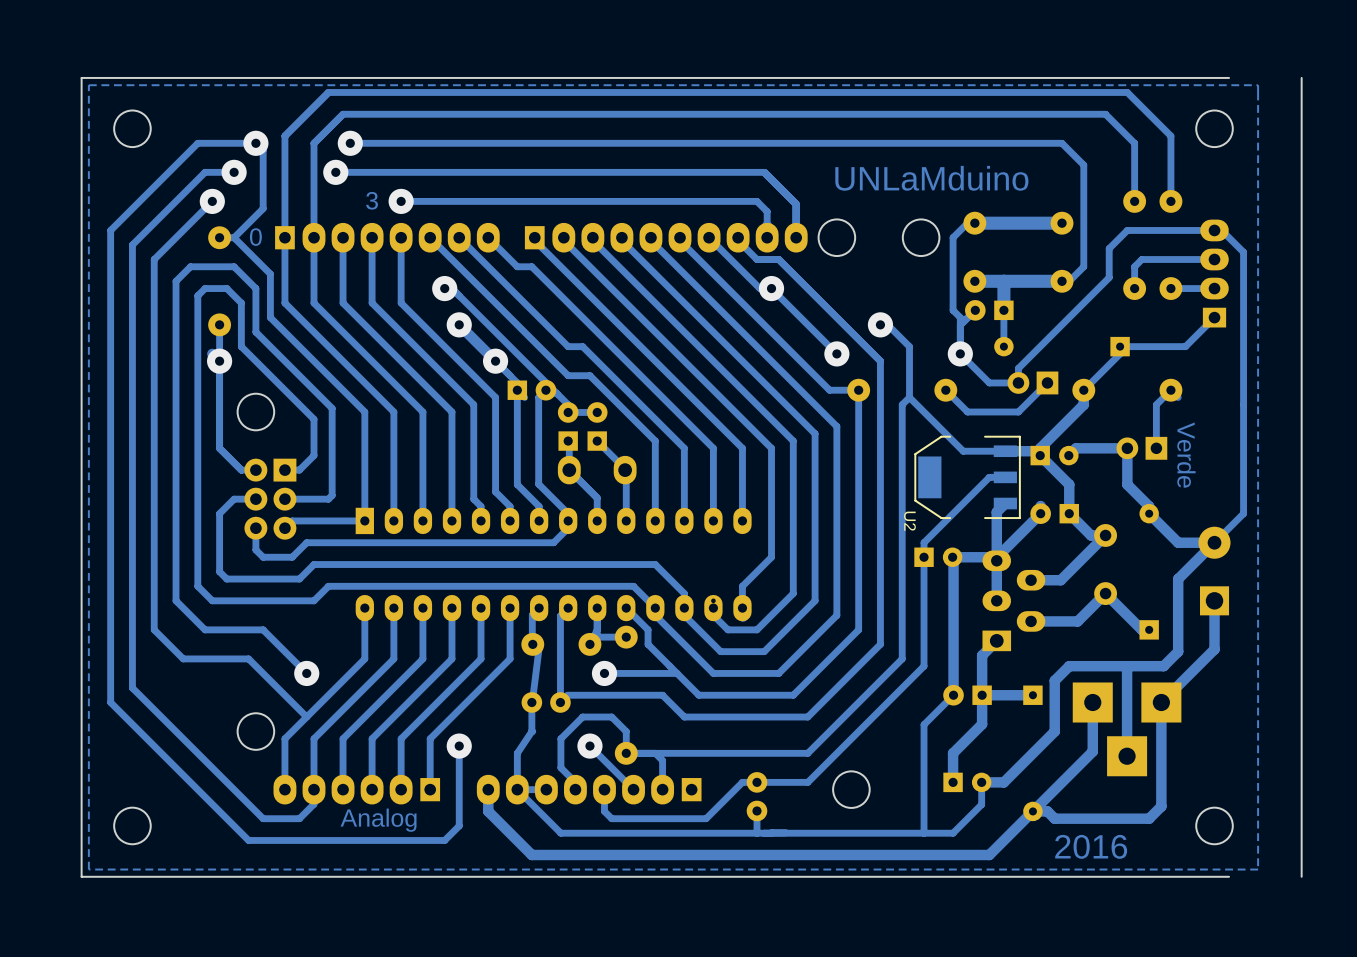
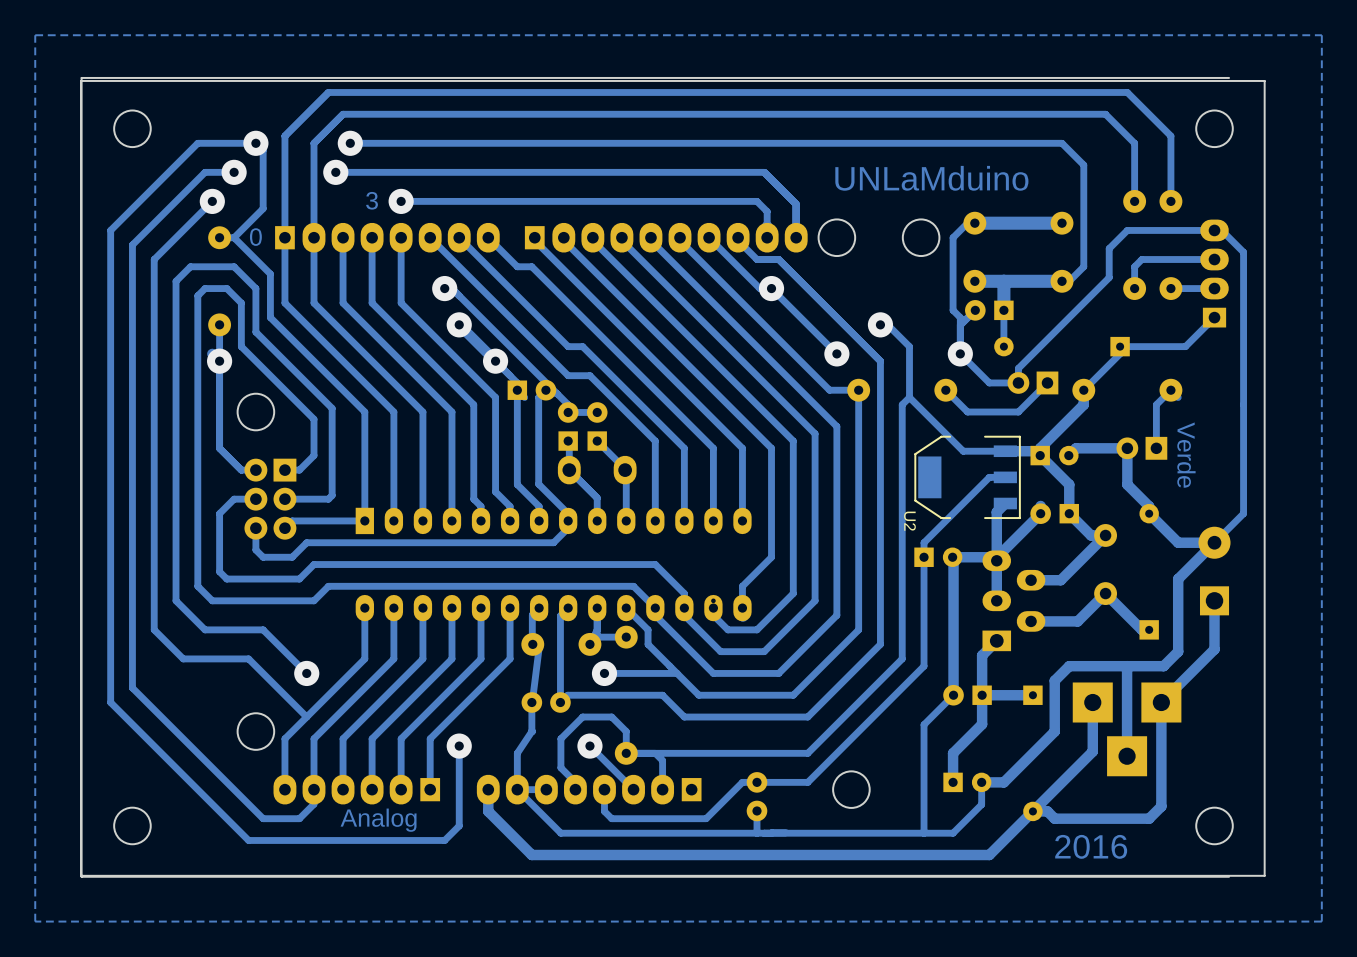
board edge: (1301, 77) (1301, 876) -> none
board edge: none -> (1264, 80) (1264, 875) (80, 875) (80, 80) (1264, 80)
zone outline: (1258, 85) (1258, 869) (88, 869) (88, 85) (1258, 85) -> (1321, 35) (1321, 921) (35, 921) (35, 35) (1321, 35)

